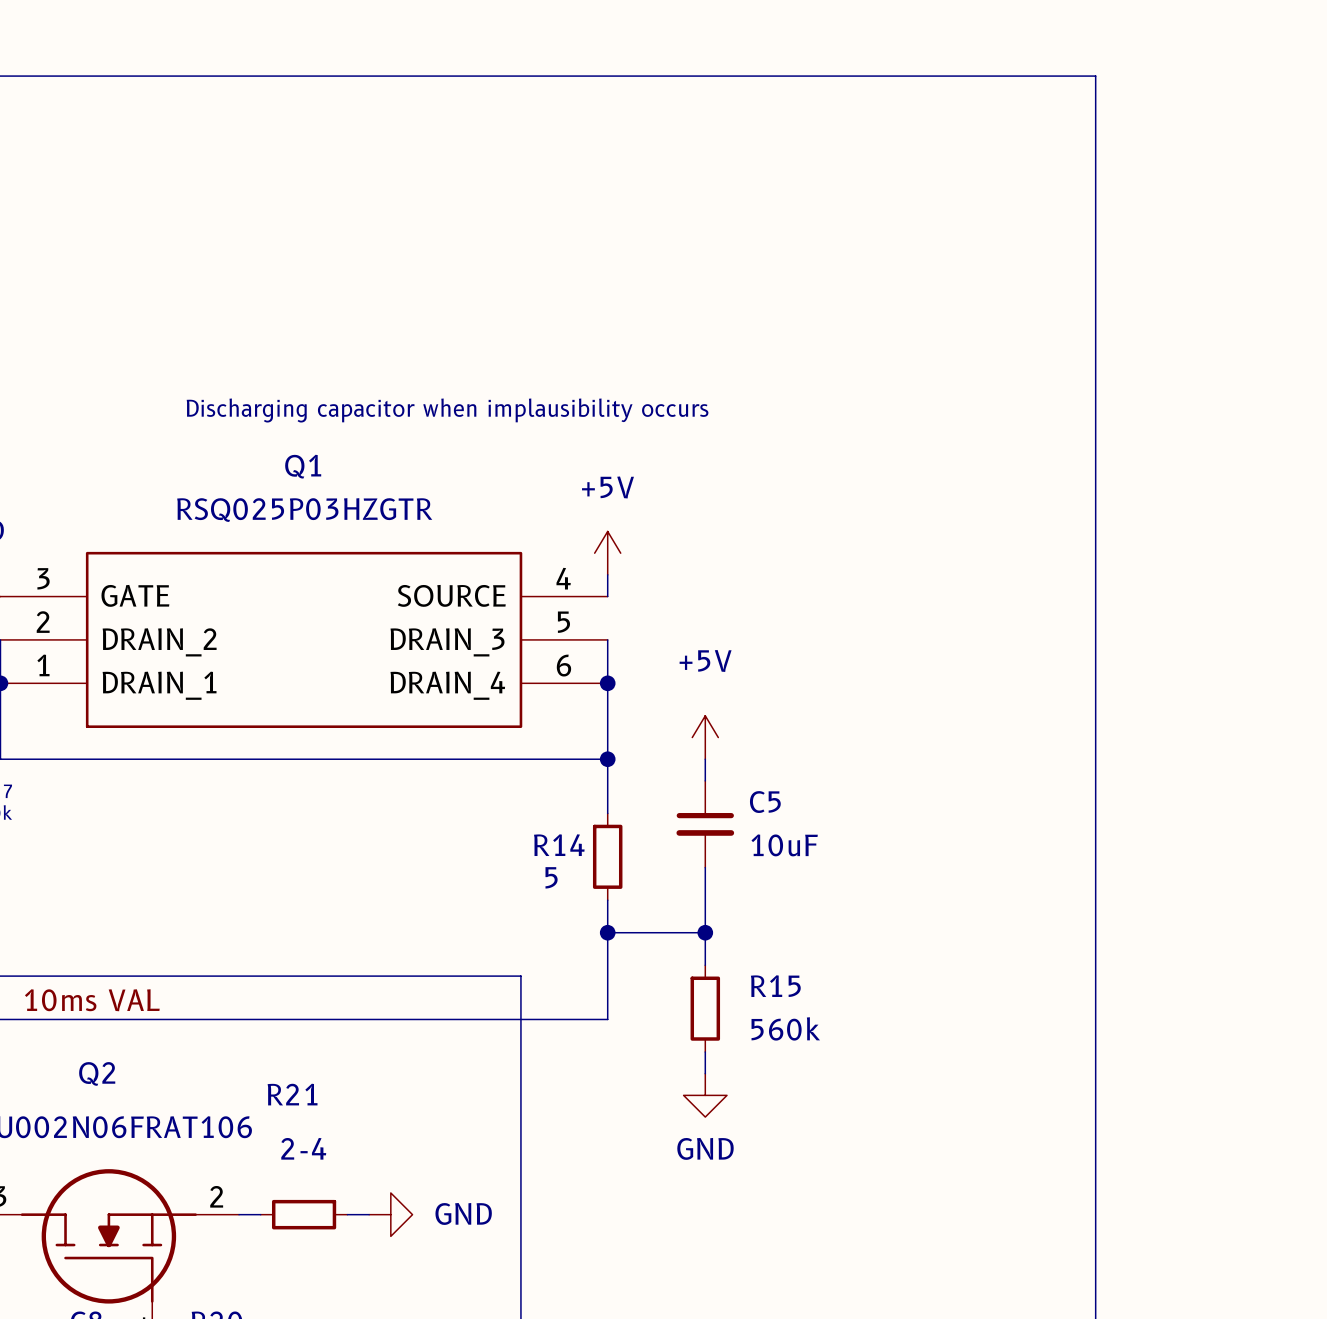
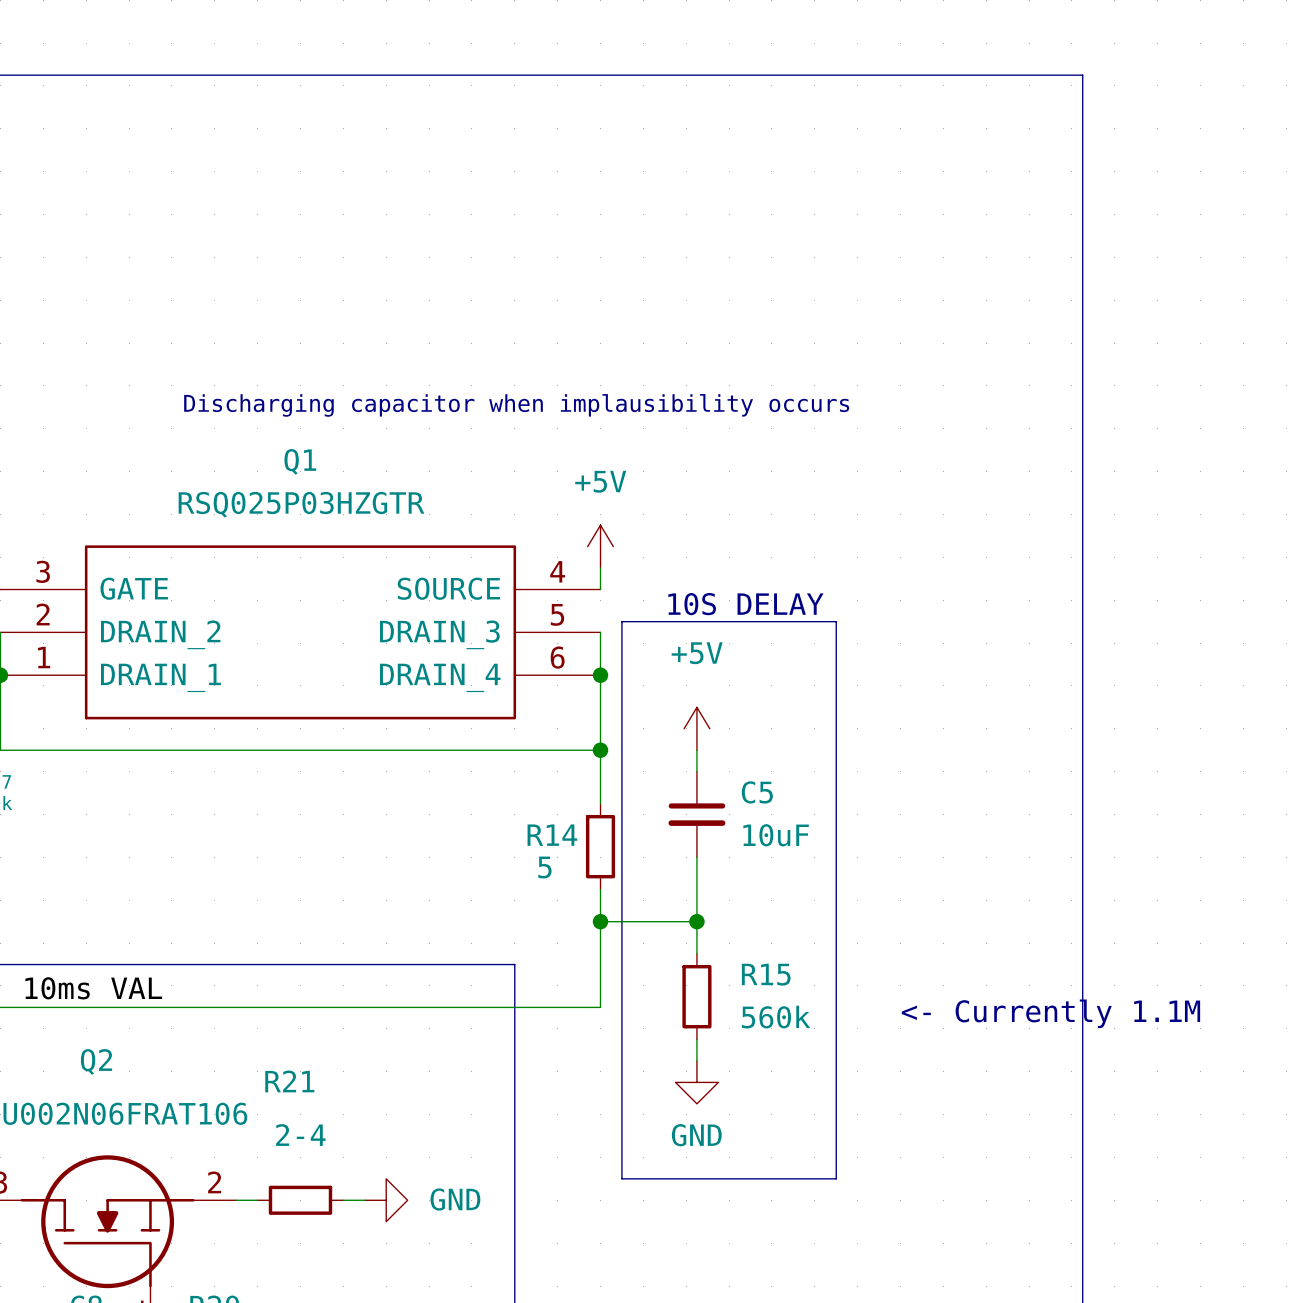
text: none -> 10S DELAY (745, 604)
line: none -> (621, 621) (621, 1178) (836, 1178) (836, 621) (621, 621)
text: none -> <- Currently 1.1M (1050, 1013)

